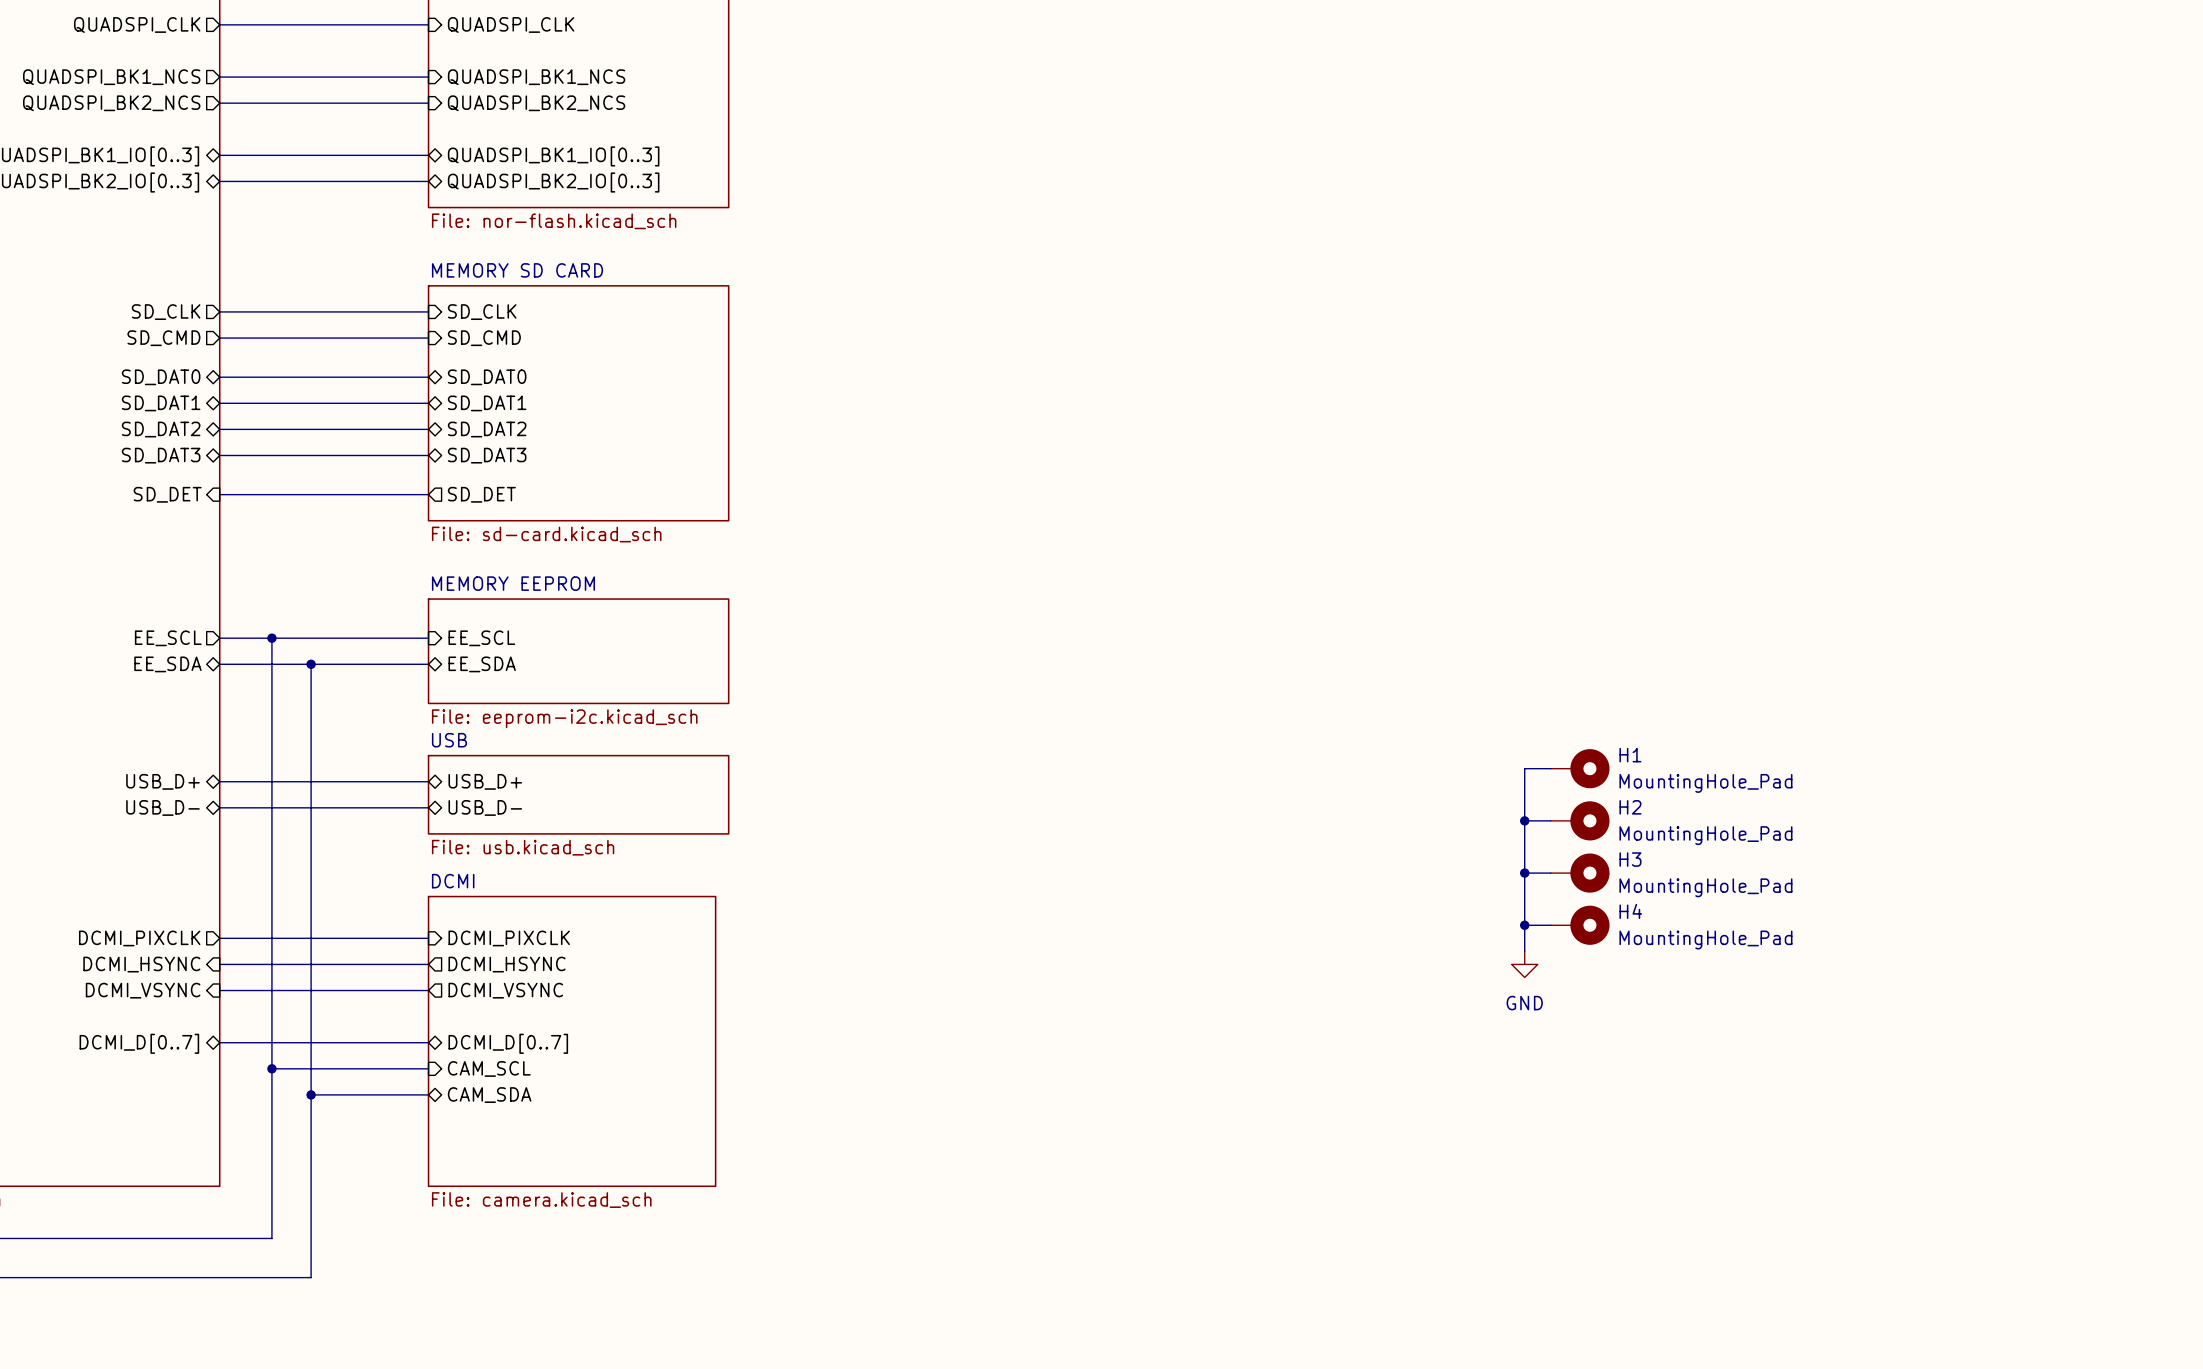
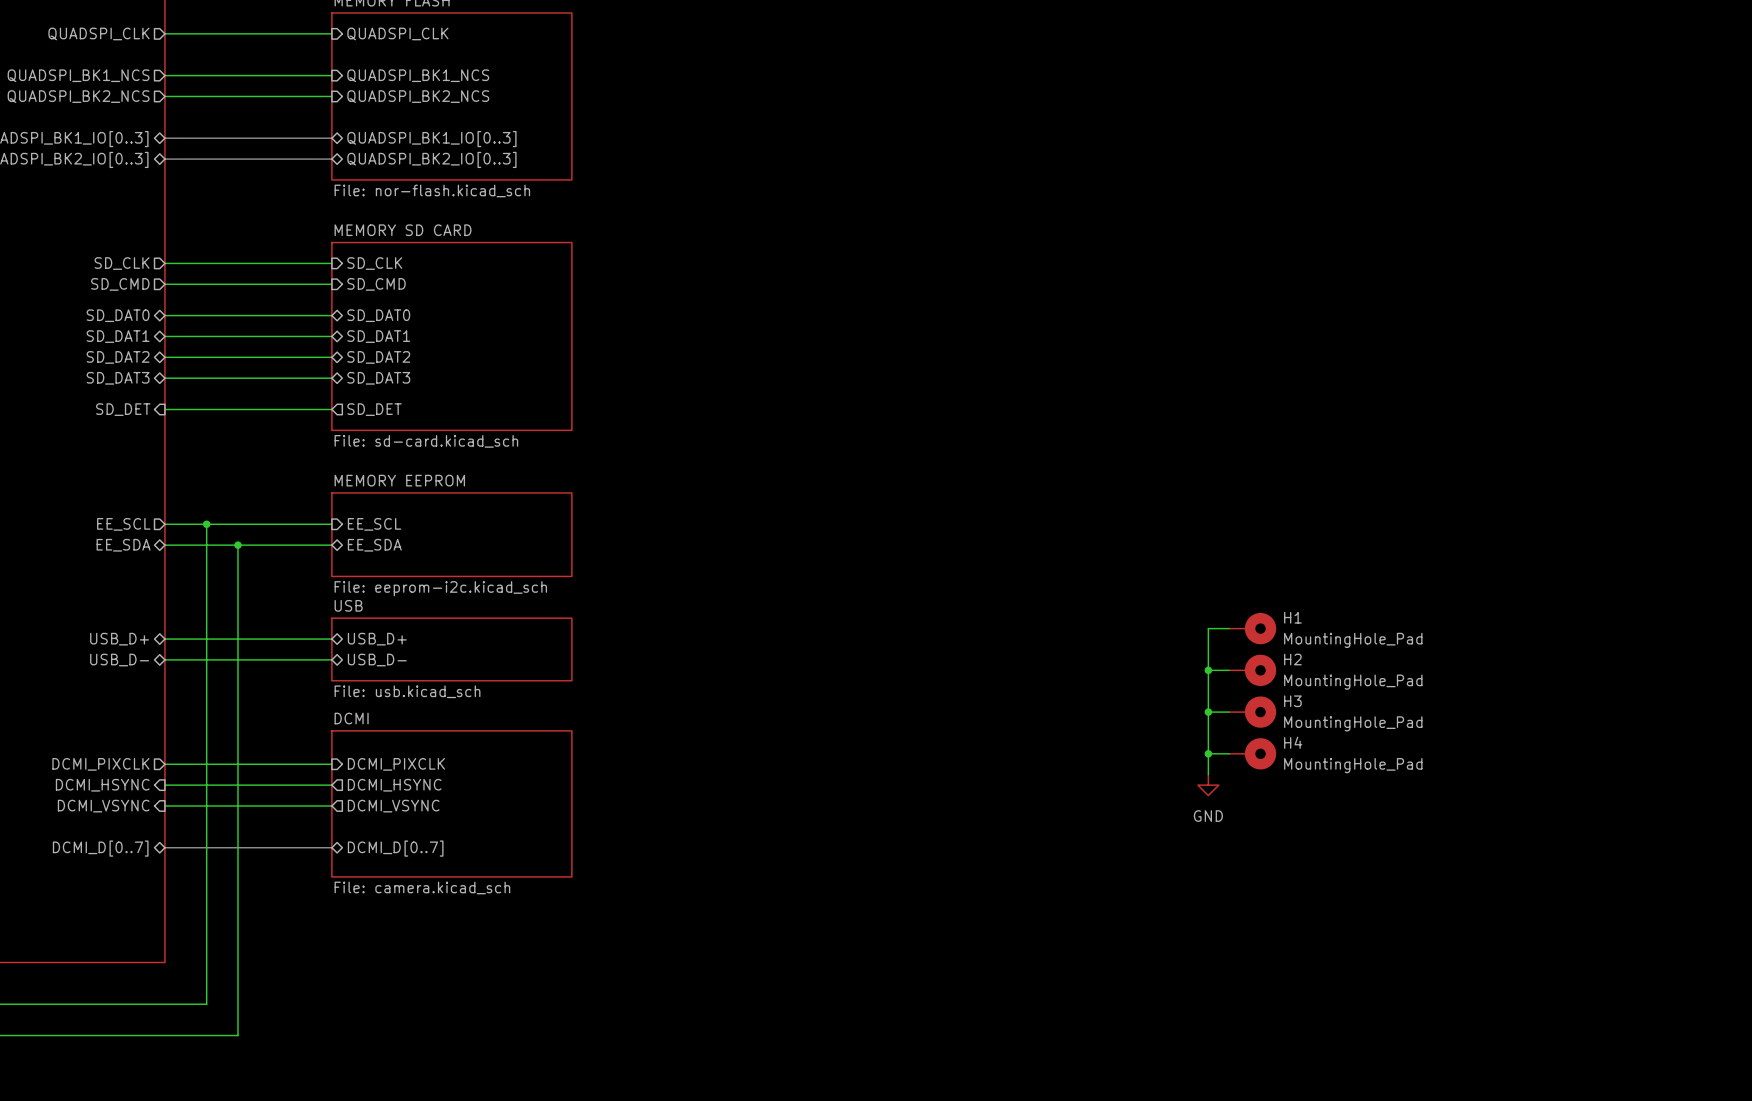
sheet DCMI: none -> File: camera.kicad_sch (451, 803)
sheet DCMI: File: camera.kicad_sch (572, 1041) -> none
wire: (271, 1068) (428, 1068) -> none
junction: (271, 1068) -> none
sheet pin: CAM_SCL (489, 1068) -> none
wire: (311, 1094) (428, 1094) -> none
junction: (311, 1094) -> none
sheet pin: CAM_SDA (489, 1095) -> none

